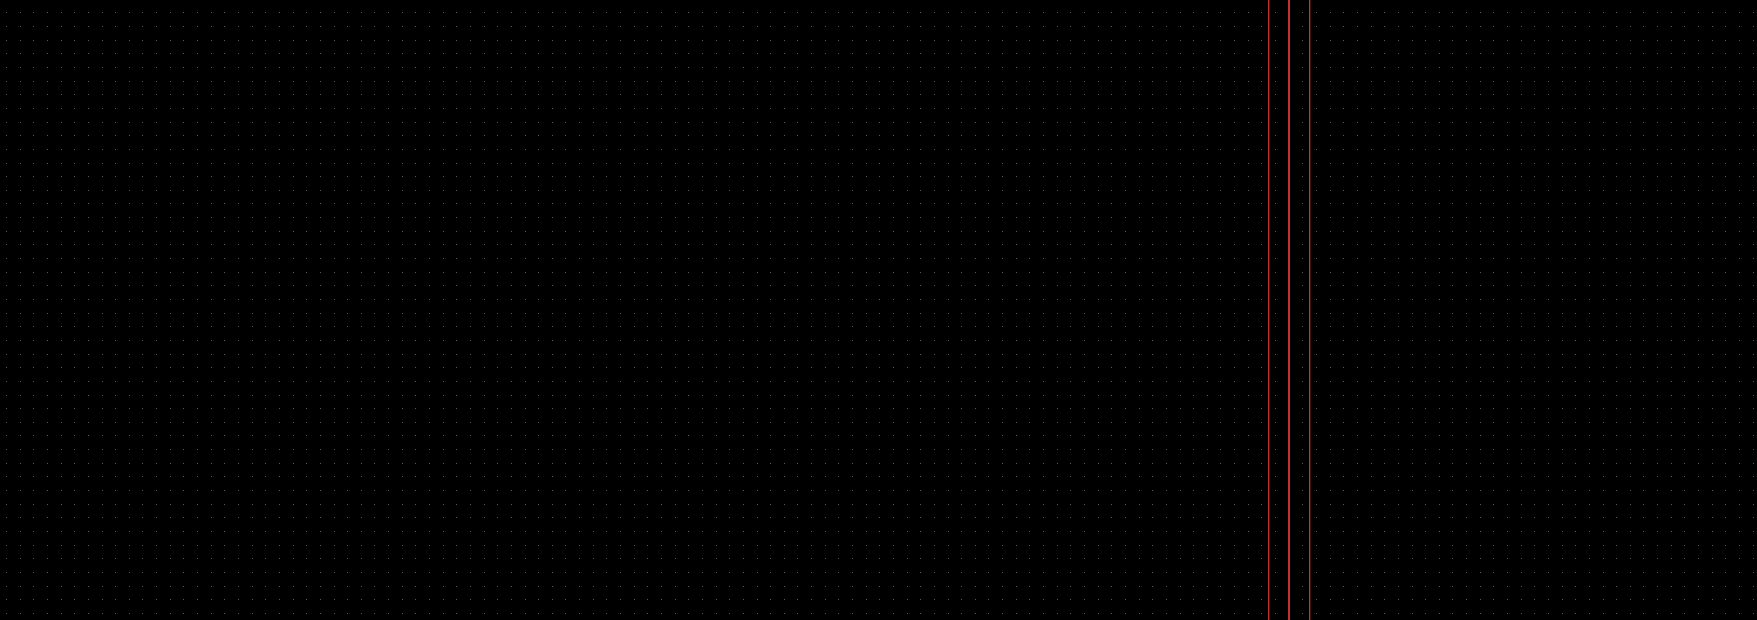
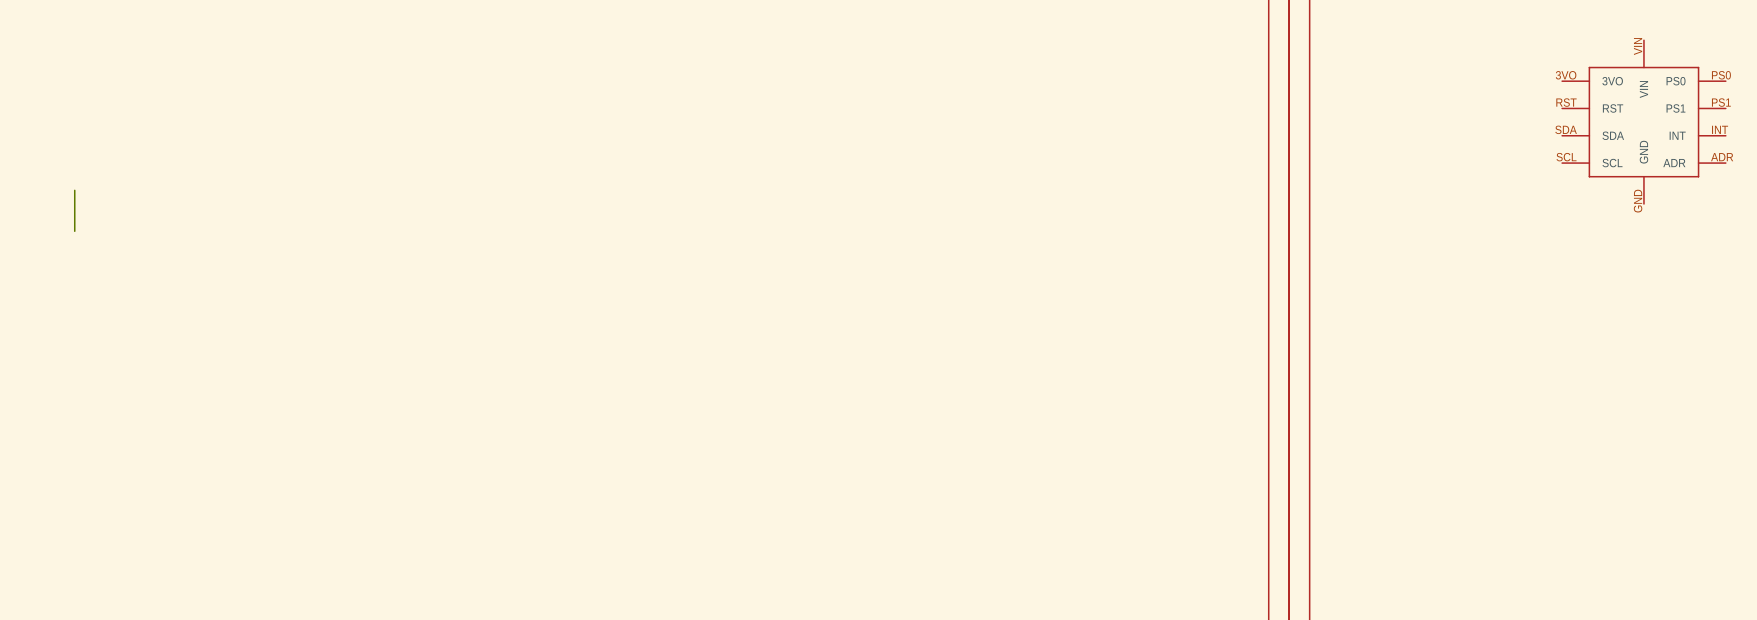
part: none -> (1643, 122)
wire: none -> (74, 190) (74, 231)

